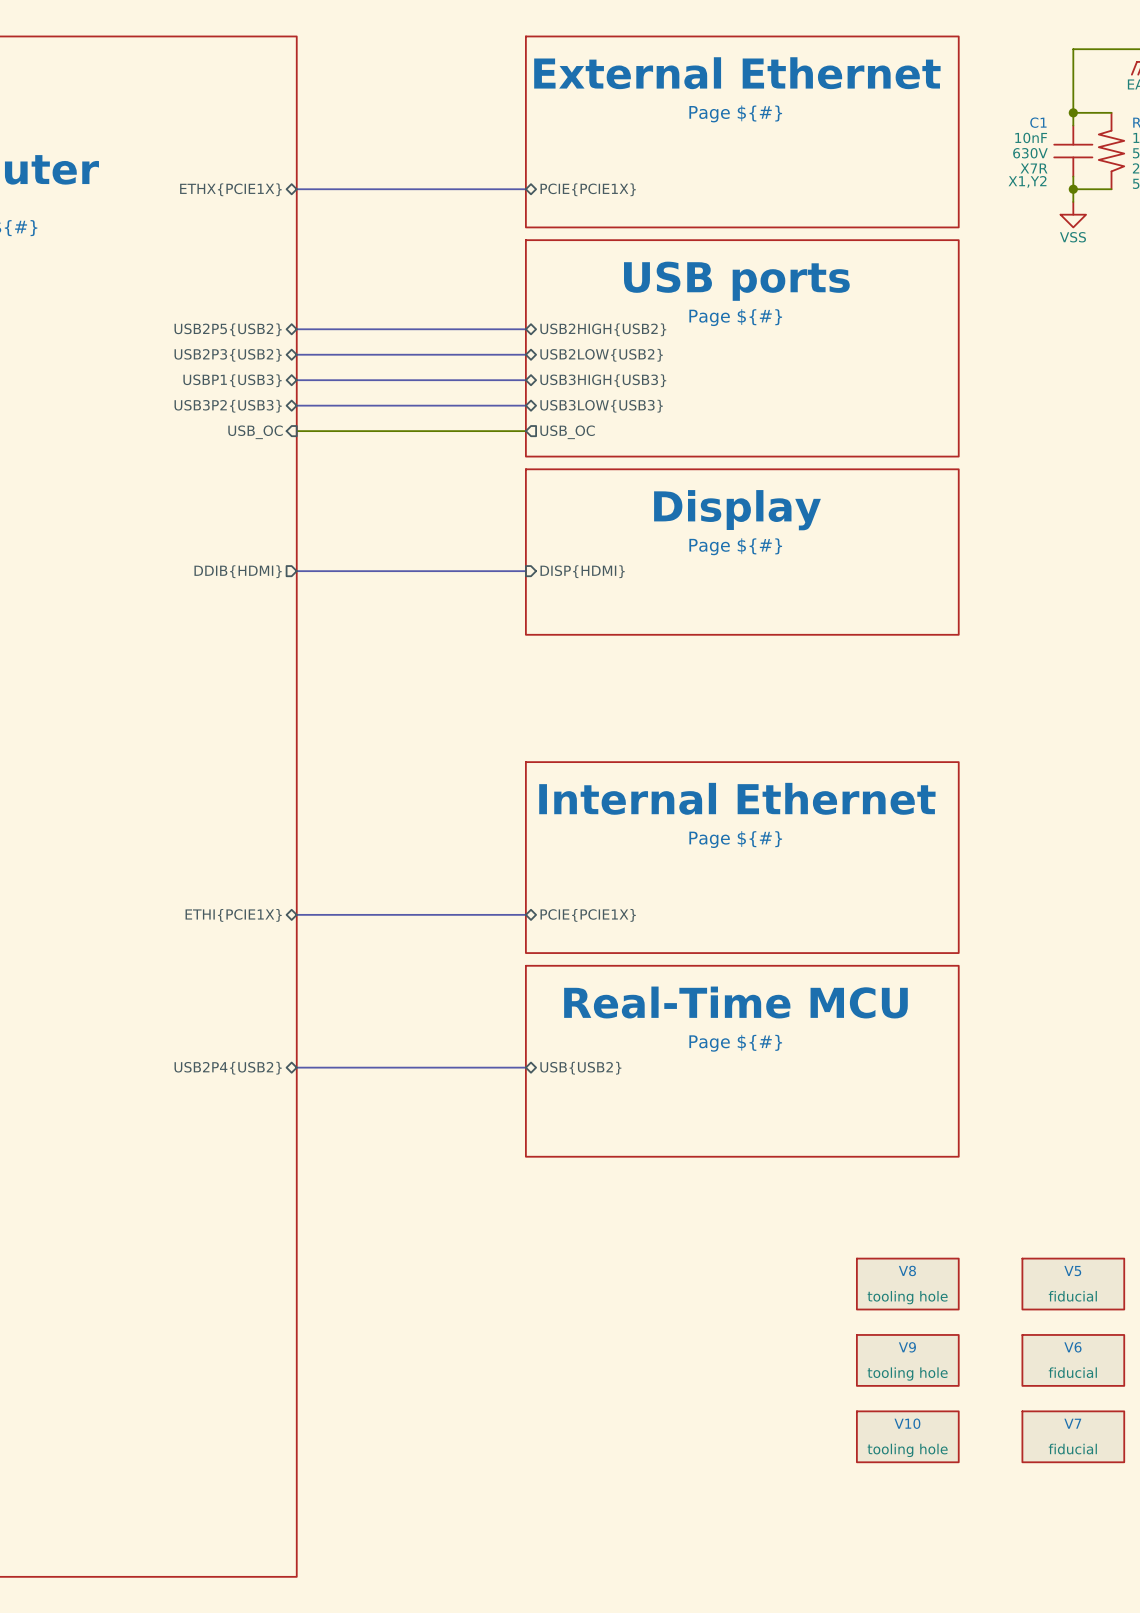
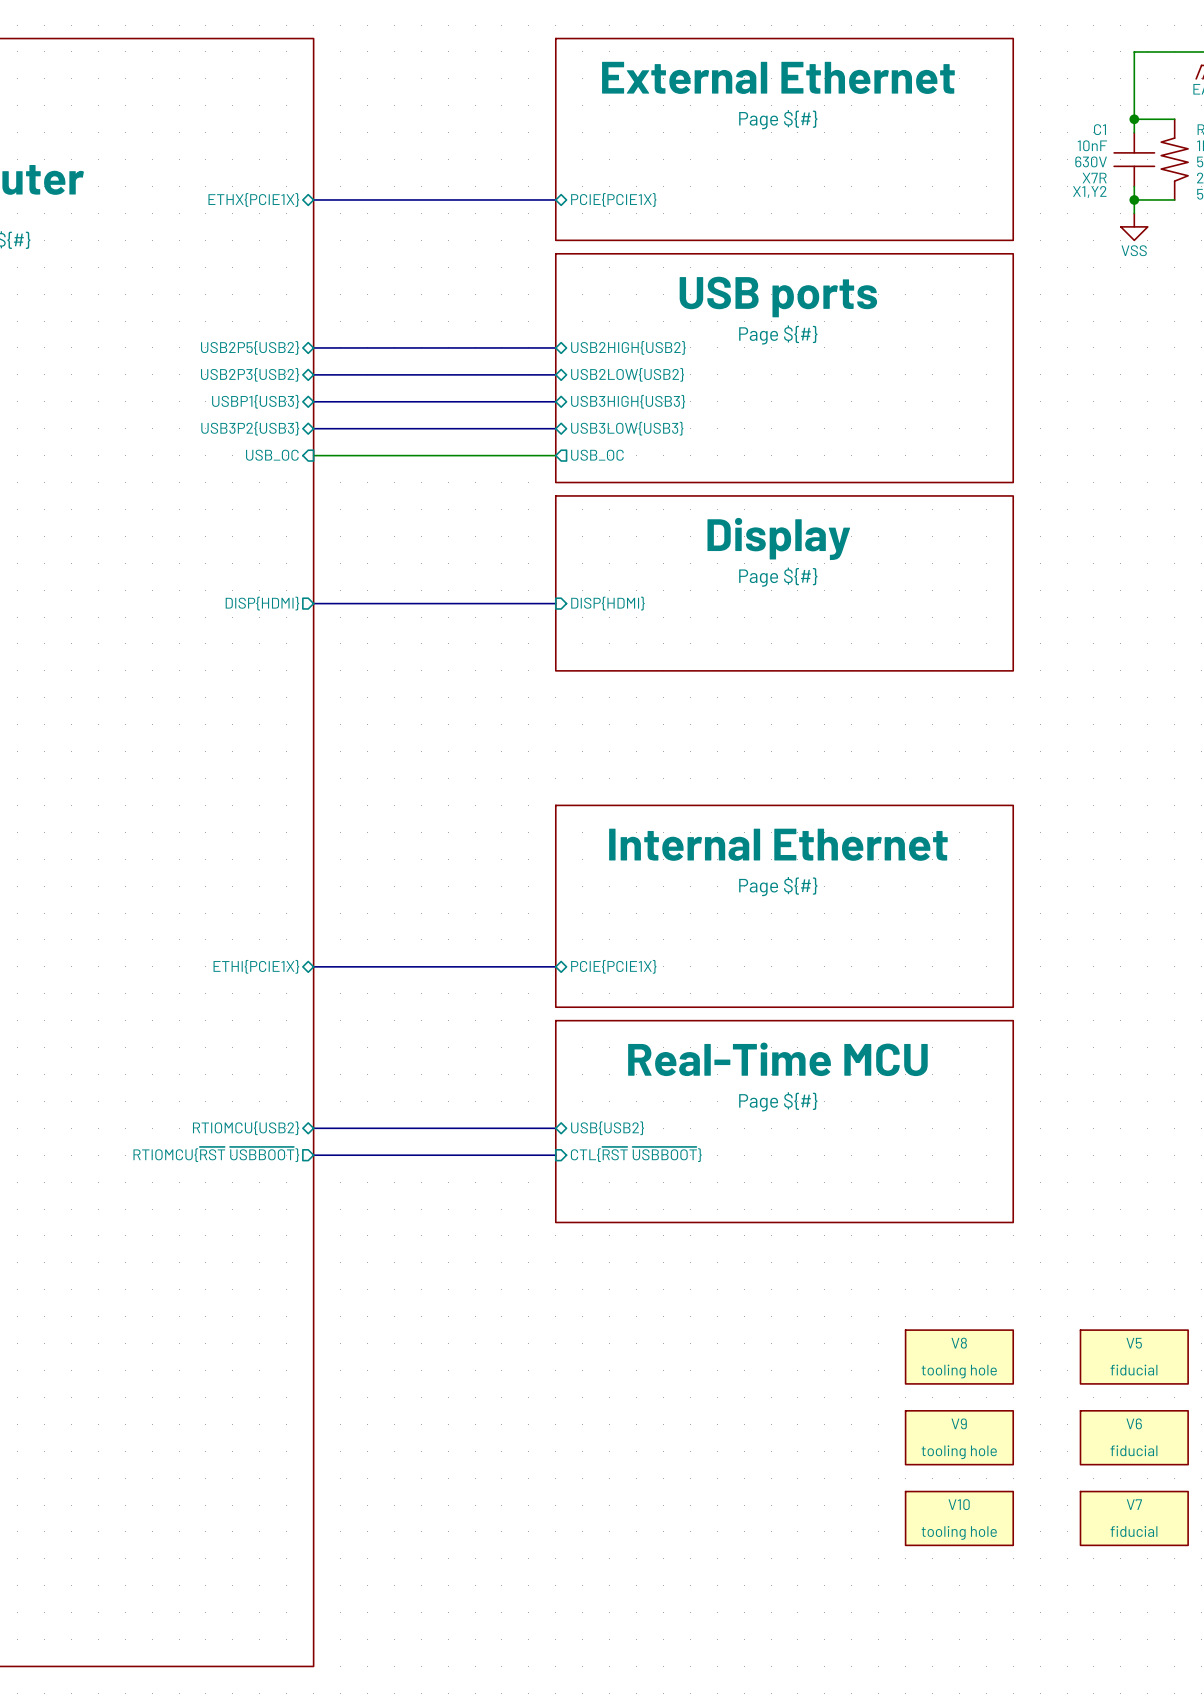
sheet pin: DDIB{HDMI} (238, 571) -> DISP{HDMI} (262, 603)
sheet pin: USB2P4{USB2} (228, 1068) -> RTIOMCU{USB2} (246, 1128)
sheet pin: none -> RTIOMCU{~{RST} ~{USBBOOT}} (216, 1154)
sheet pin: none -> CTL{~{RST} ~{USBBOOT}} (636, 1154)
bus: none -> (313, 1155) (555, 1155)

